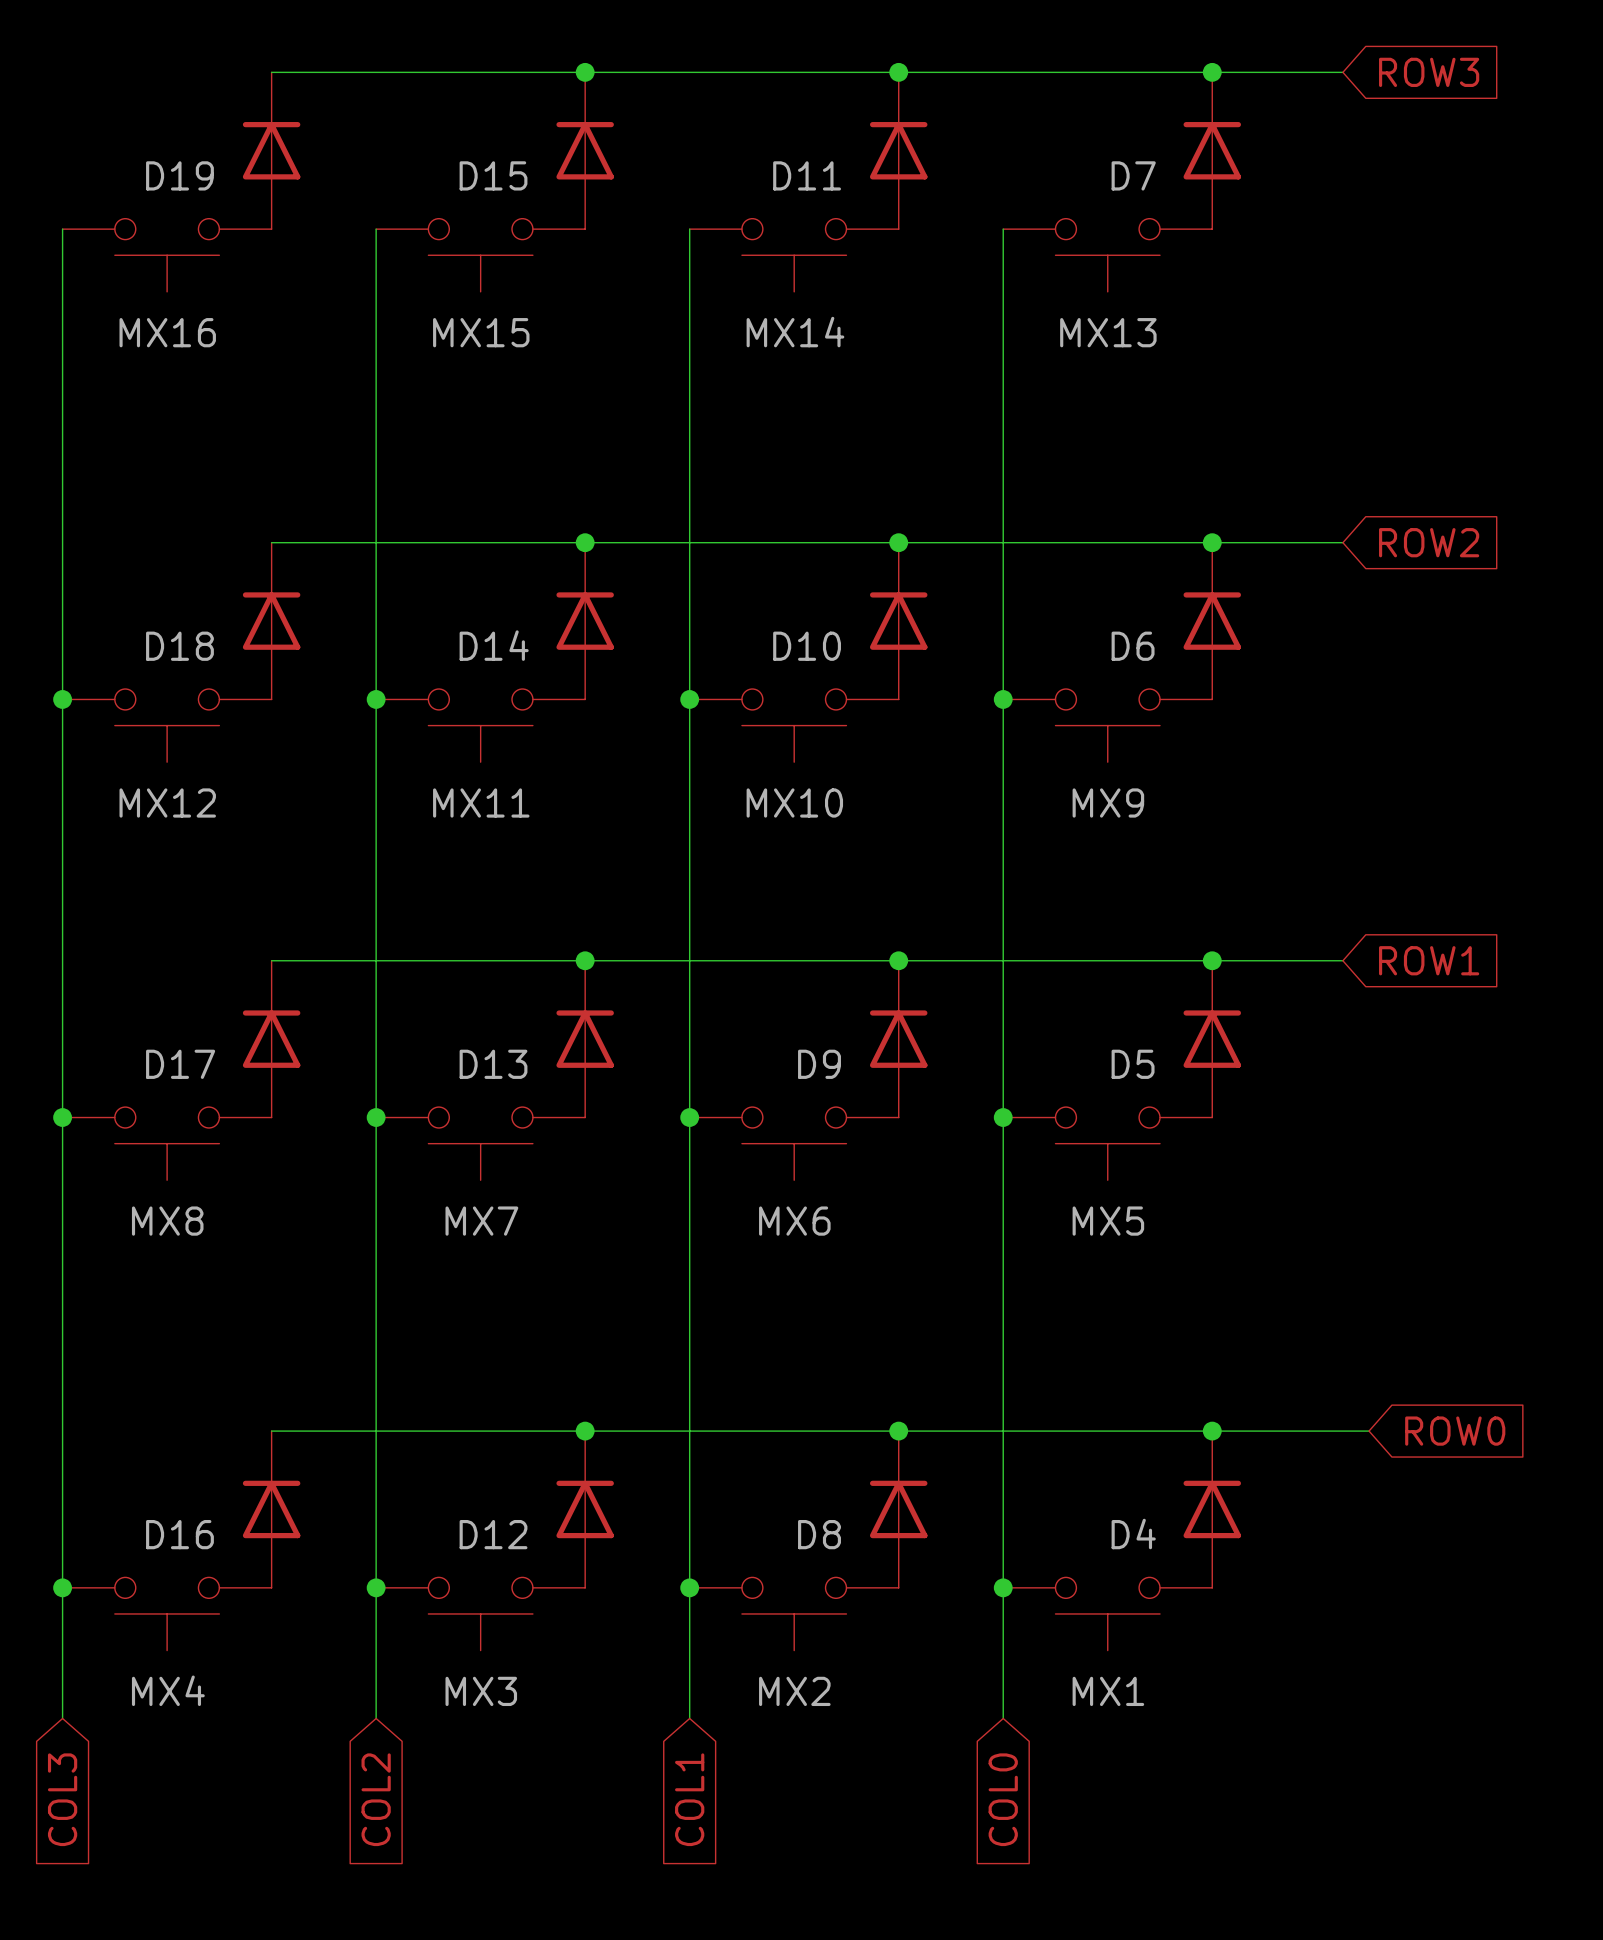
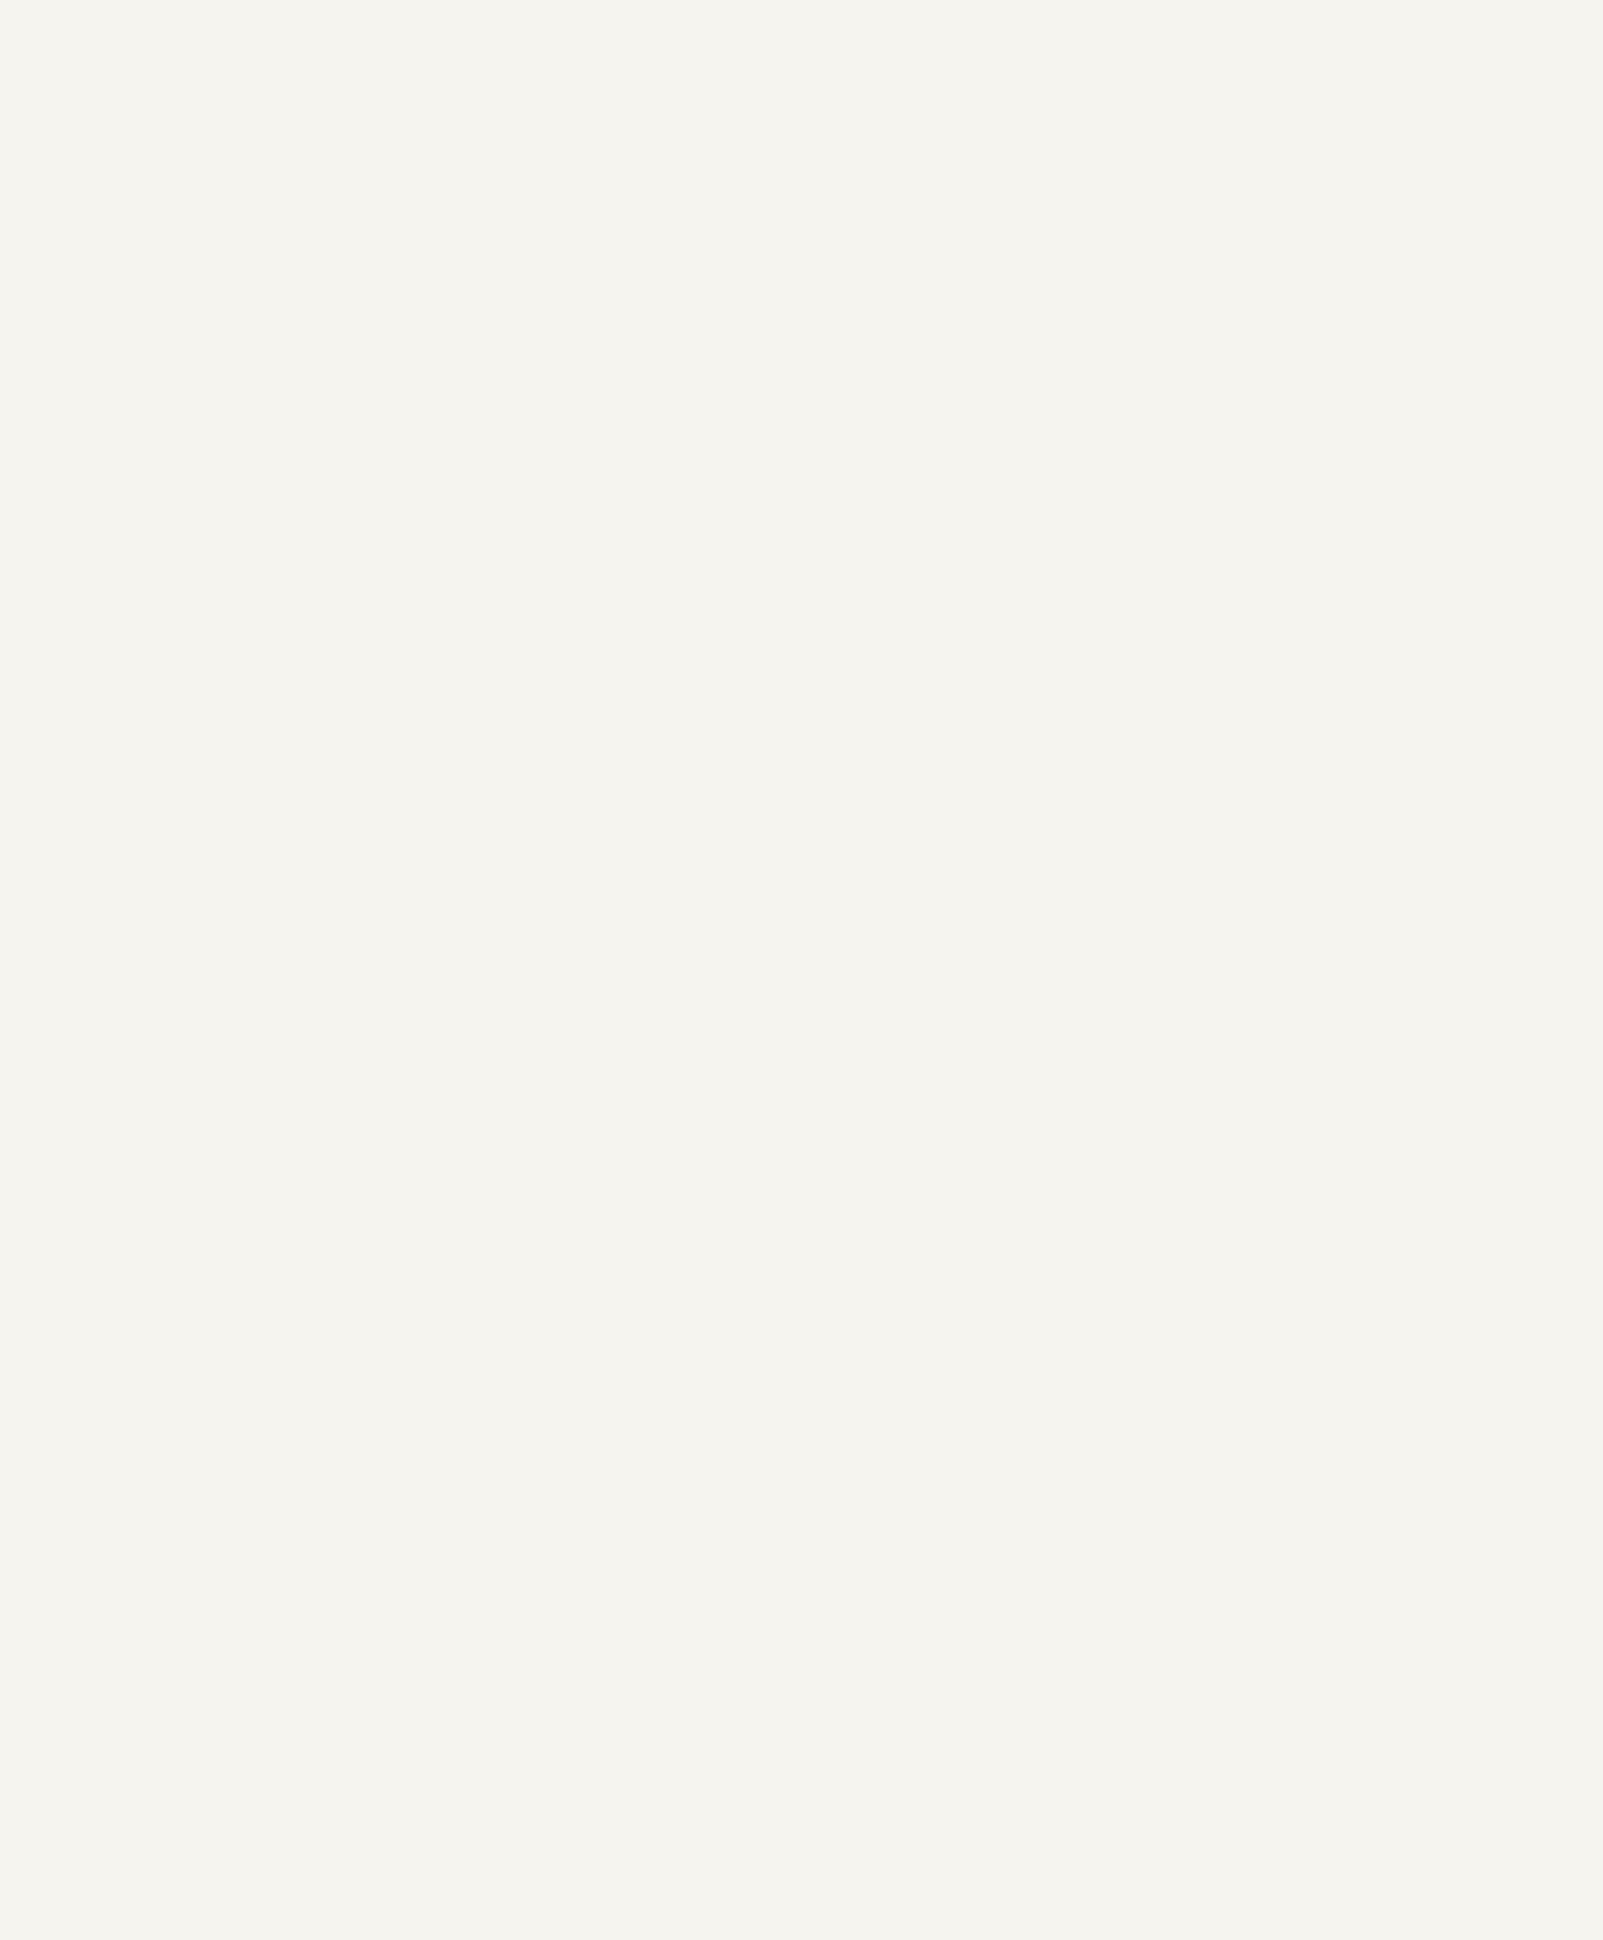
wire: (271, 72) (1342, 72) -> none
junction: (585, 72) -> none
junction: (898, 72) -> none
junction: (1212, 72) -> none
global label: ROW3 (1429, 72) -> none
D19: (271, 150) -> none
D15: (585, 150) -> none
D11: (898, 150) -> none
D7: (1212, 150) -> none
wire: (62, 229) (62, 1718) -> none
wire: (376, 229) (376, 1718) -> none
wire: (689, 229) (689, 1718) -> none
wire: (1003, 229) (1003, 1718) -> none
part: MX16 (167, 255) -> none
part: MX15 (480, 255) -> none
part: MX14 (794, 255) -> none
part: MX13 (1107, 255) -> none
wire: (271, 542) (1342, 542) -> none
junction: (585, 542) -> none
junction: (898, 542) -> none
junction: (1212, 542) -> none
global label: ROW2 (1429, 542) -> none
D18: (271, 621) -> none
D14: (585, 621) -> none
D10: (898, 621) -> none
D6: (1212, 621) -> none
junction: (62, 699) -> none
junction: (376, 699) -> none
junction: (689, 699) -> none
junction: (1003, 699) -> none
part: MX12 (167, 725) -> none
part: MX11 (480, 725) -> none
part: MX10 (794, 725) -> none
part: MX9 (1107, 725) -> none
wire: (271, 960) (1342, 960) -> none
junction: (585, 960) -> none
junction: (898, 960) -> none
junction: (1212, 960) -> none
global label: ROW1 (1429, 960) -> none
D17: (271, 1039) -> none
D13: (585, 1039) -> none
D9: (898, 1039) -> none
D5: (1212, 1039) -> none
junction: (62, 1117) -> none
junction: (376, 1117) -> none
junction: (689, 1117) -> none
junction: (1003, 1117) -> none
part: MX8 (167, 1143) -> none
part: MX7 (480, 1143) -> none
part: MX6 (794, 1143) -> none
part: MX5 (1107, 1143) -> none
wire: (271, 1431) (1369, 1431) -> none
junction: (585, 1431) -> none
junction: (898, 1431) -> none
junction: (1212, 1431) -> none
global label: ROW0 (1455, 1431) -> none
D16: (271, 1509) -> none
D12: (585, 1509) -> none
D8: (898, 1509) -> none
D4: (1212, 1509) -> none
junction: (62, 1587) -> none
junction: (376, 1587) -> none
junction: (689, 1587) -> none
junction: (1003, 1587) -> none
part: MX4 (167, 1613) -> none
part: MX3 (480, 1613) -> none
part: MX2 (794, 1613) -> none
part: MX1 (1107, 1613) -> none
global label: COL3 (62, 1799) -> none
global label: COL2 (376, 1799) -> none
global label: COL1 (689, 1799) -> none
global label: COL0 (1003, 1799) -> none

